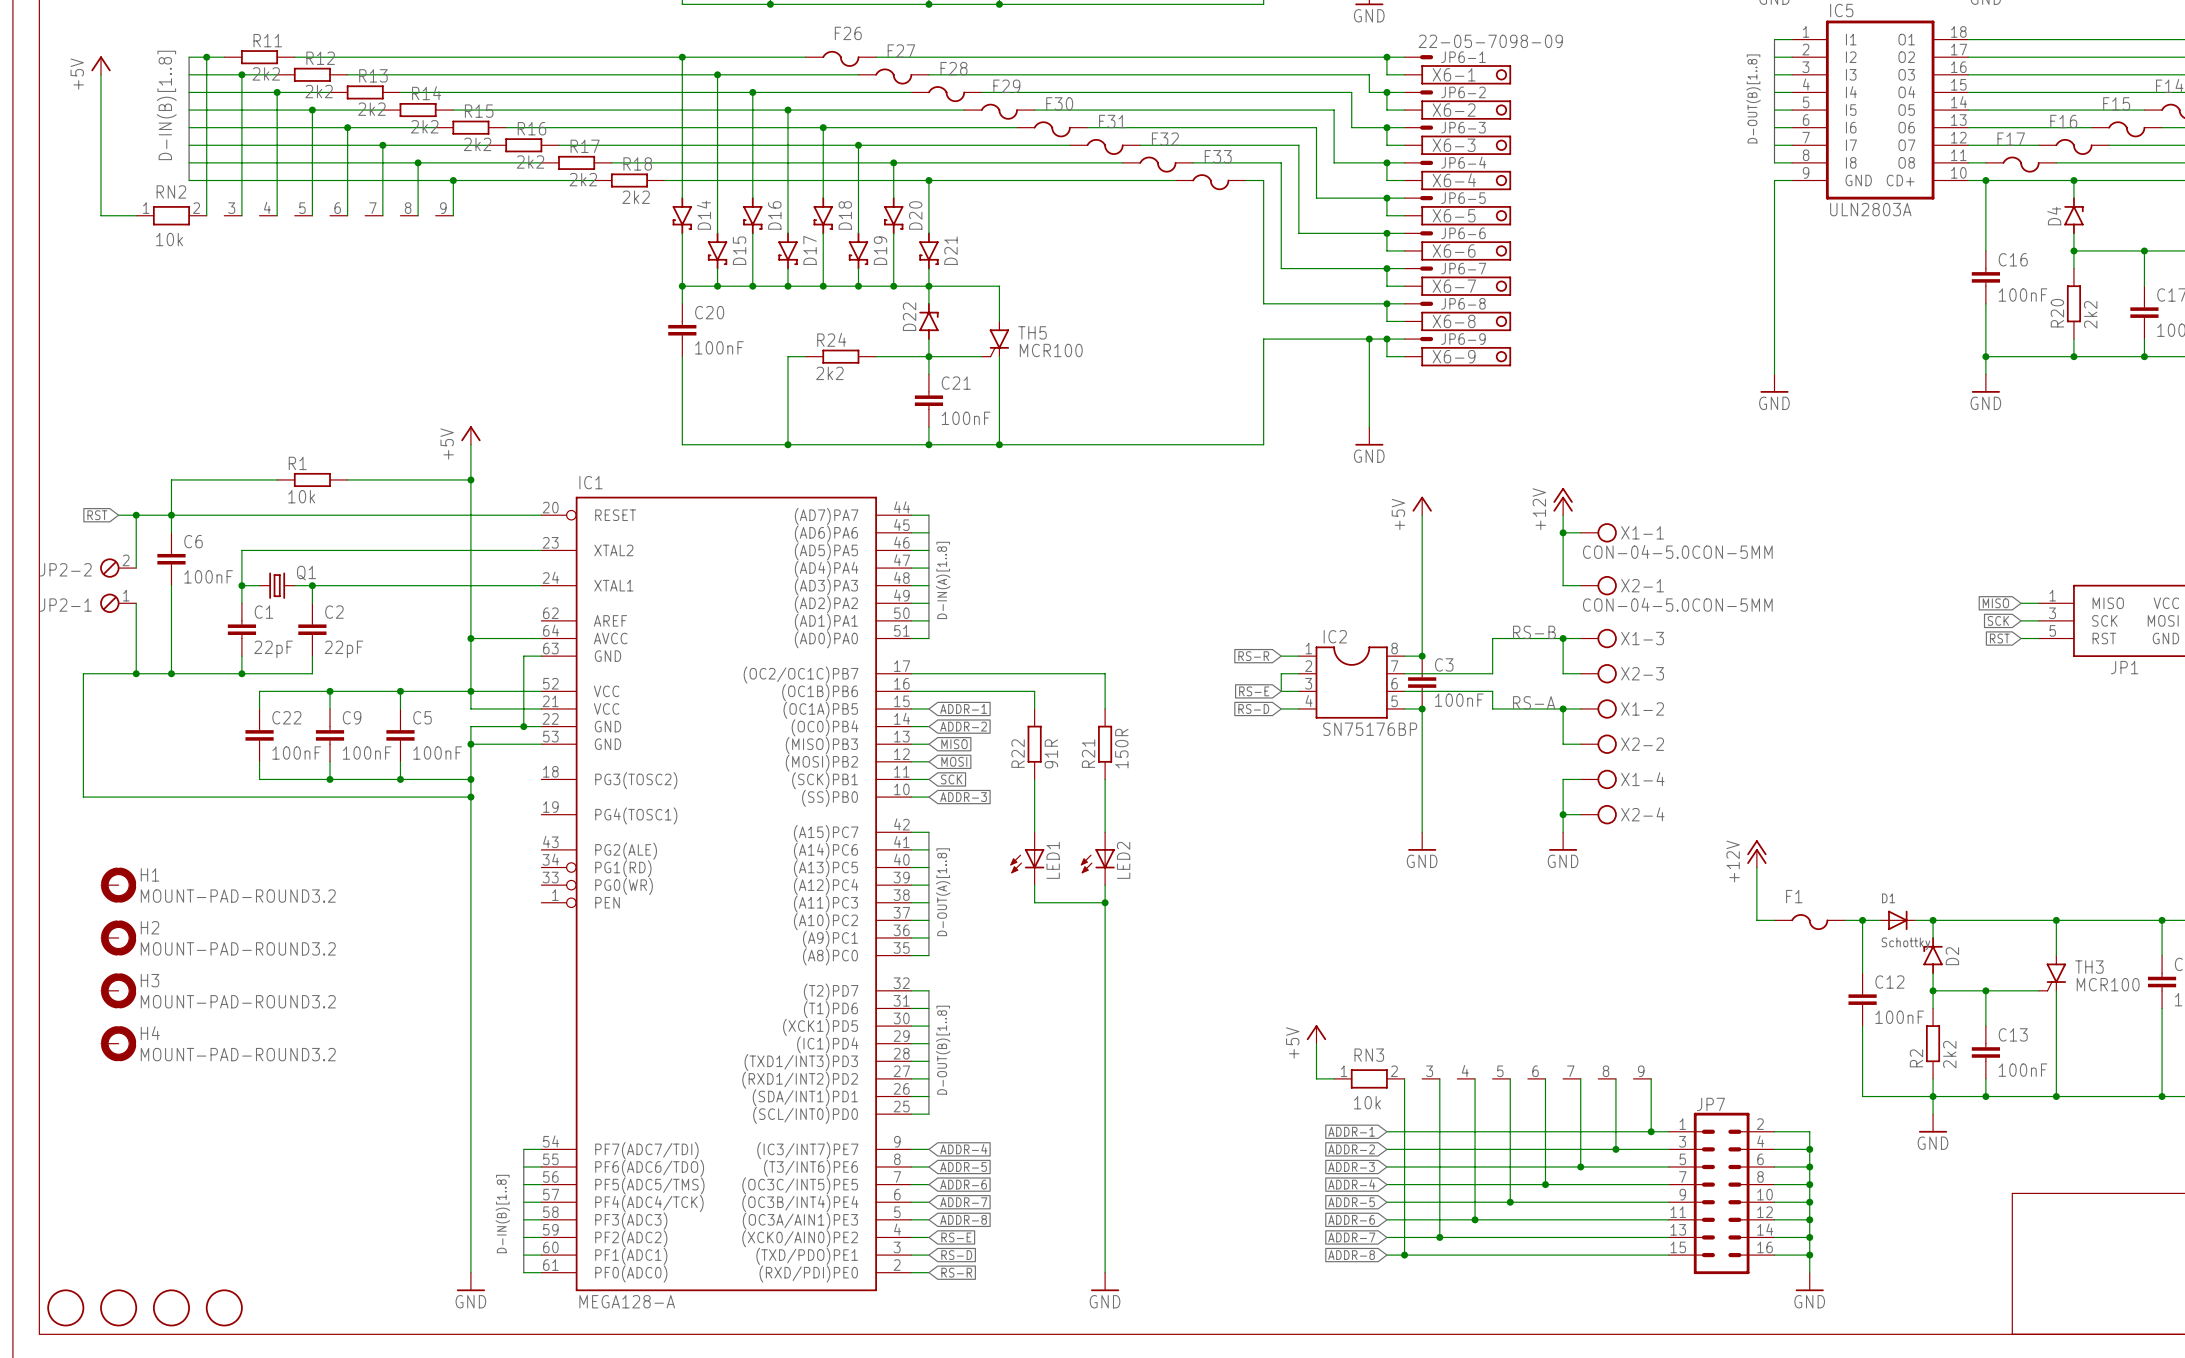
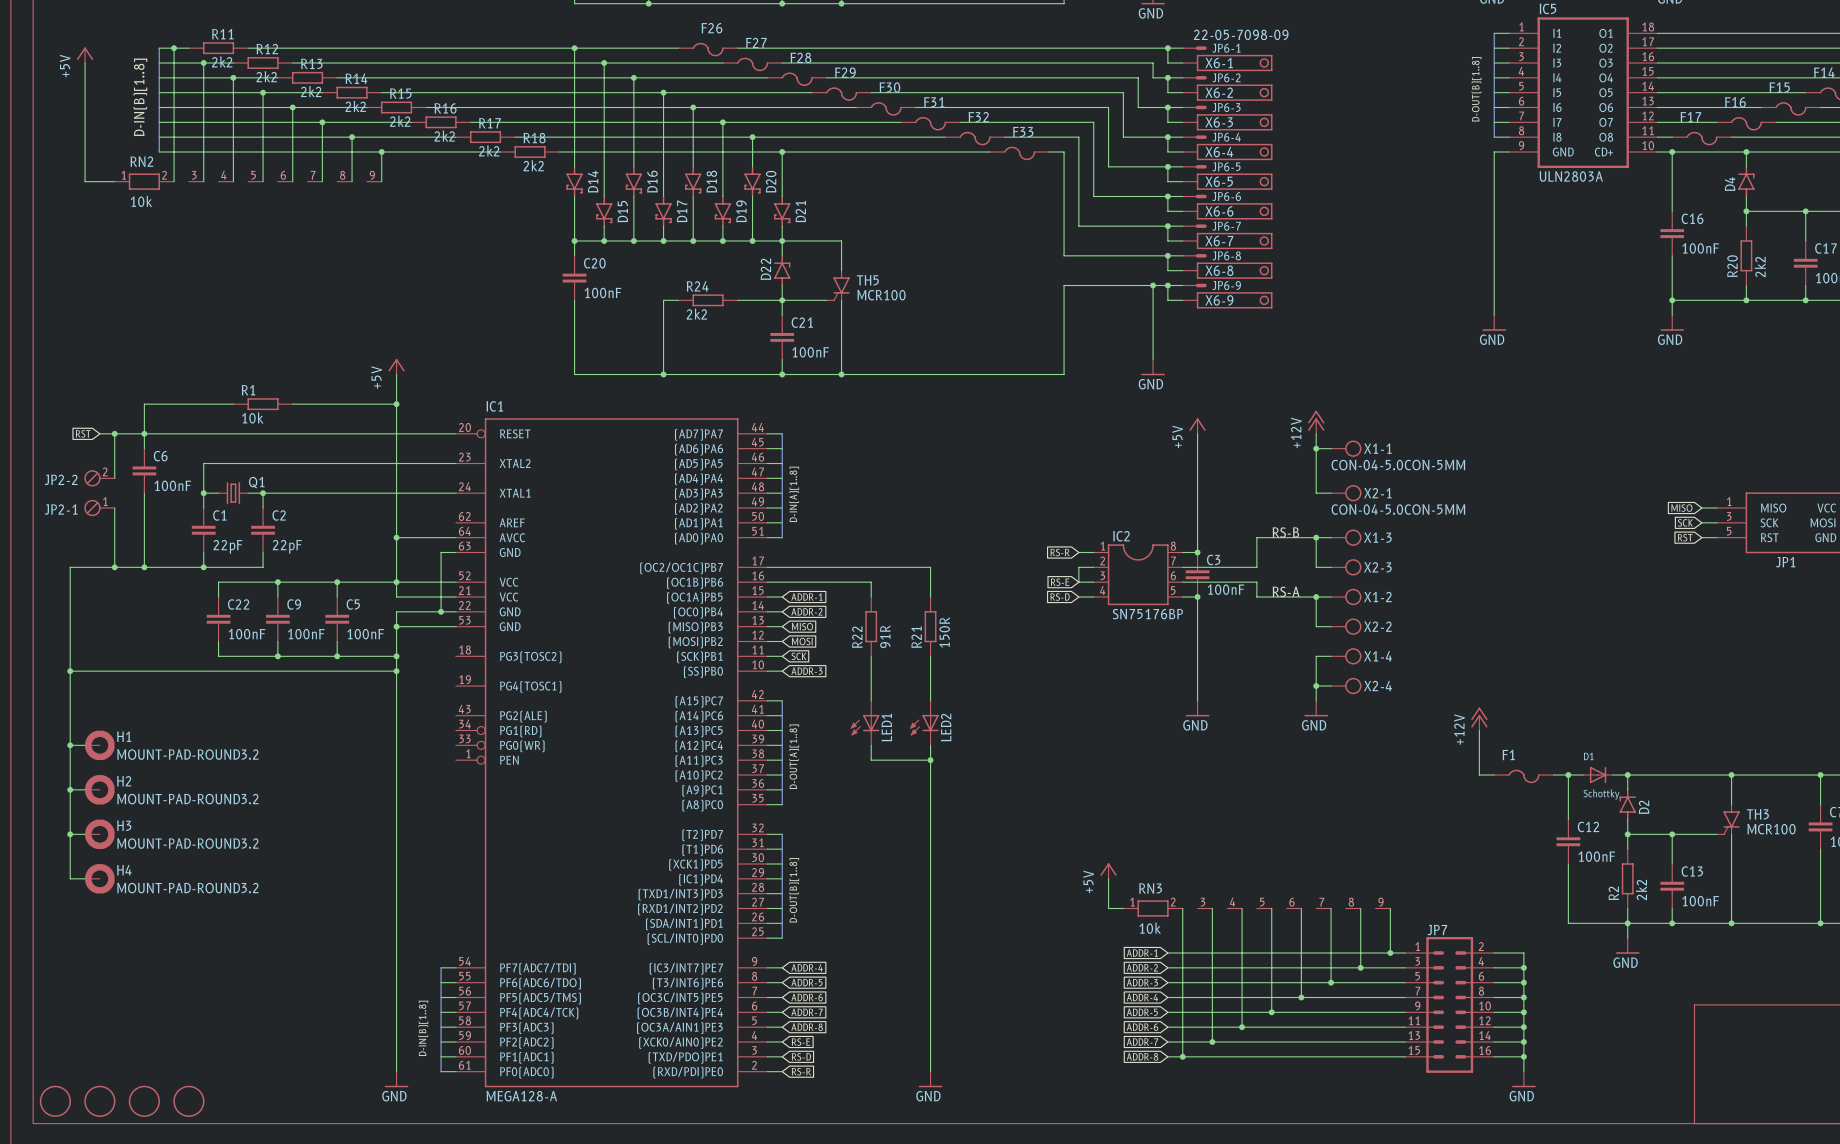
wire: none -> (70, 671) (70, 878) (85, 878)
junction: none -> (70, 671)
wire: none -> (70, 745) (85, 745)
junction: none -> (70, 745)
wire: none -> (70, 789) (85, 789)
junction: none -> (70, 789)
wire: none -> (70, 834) (85, 834)
junction: none -> (70, 834)

